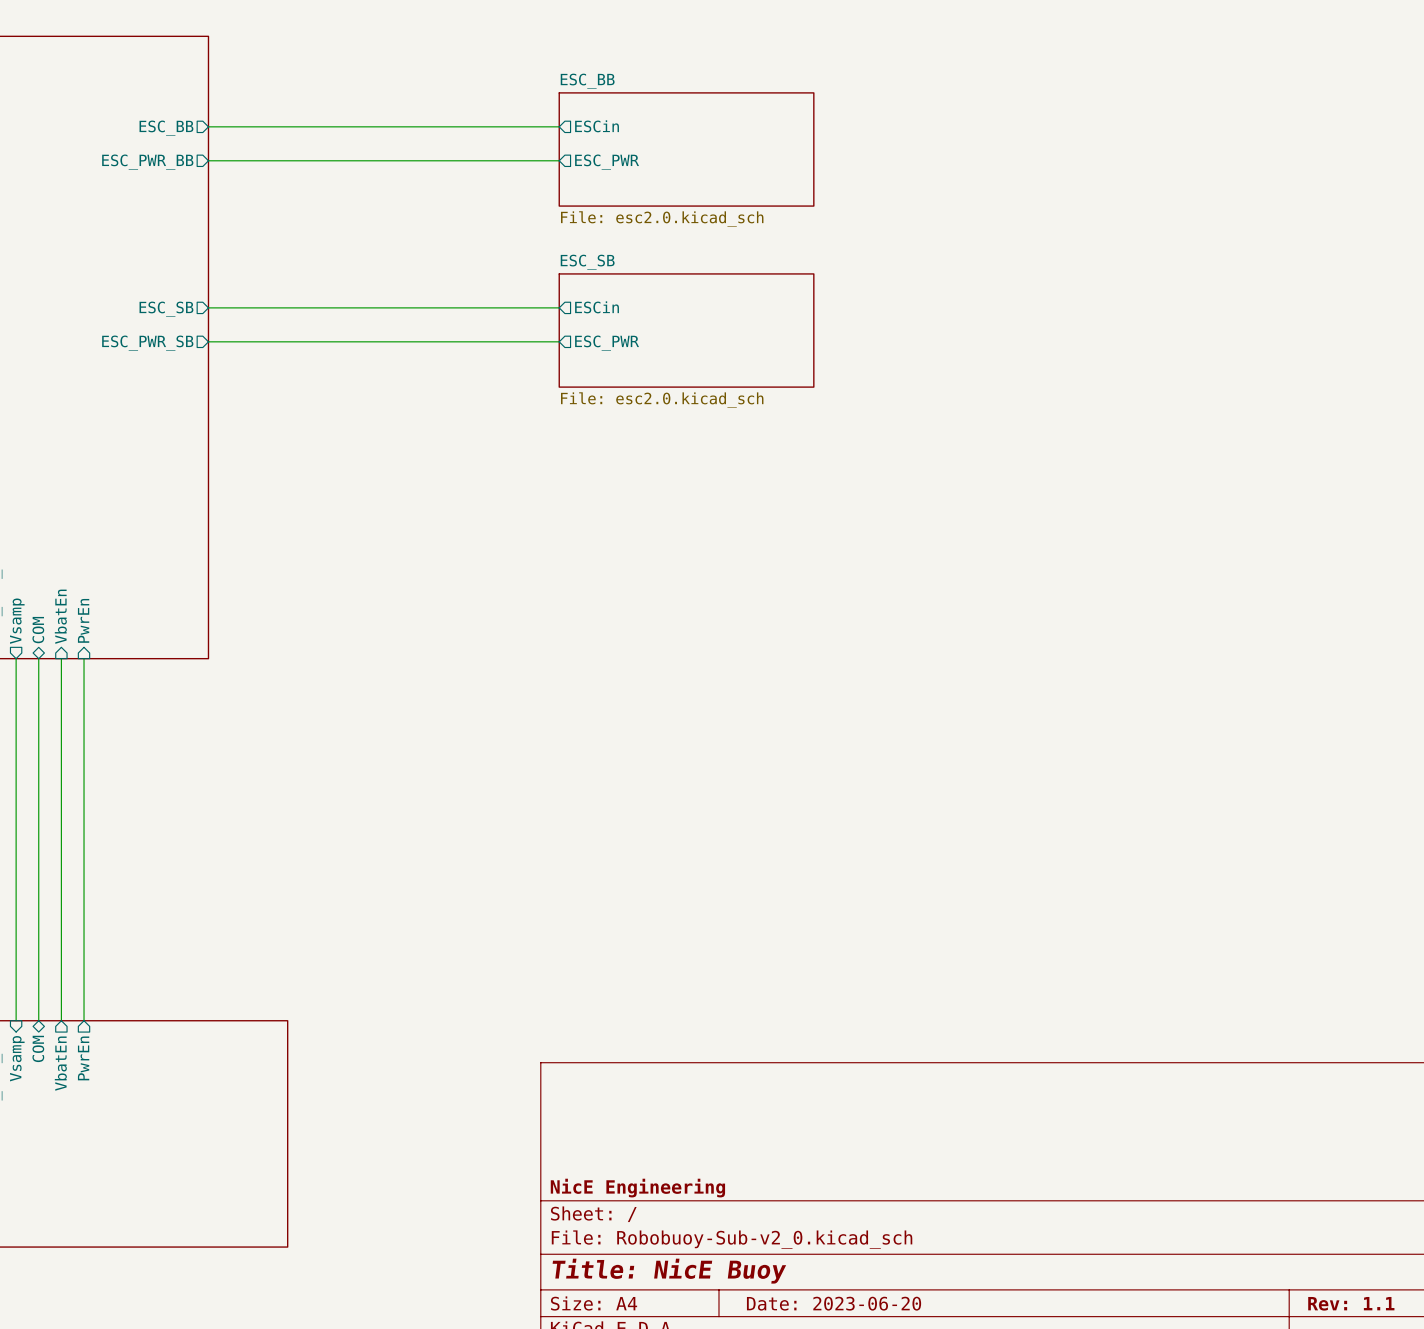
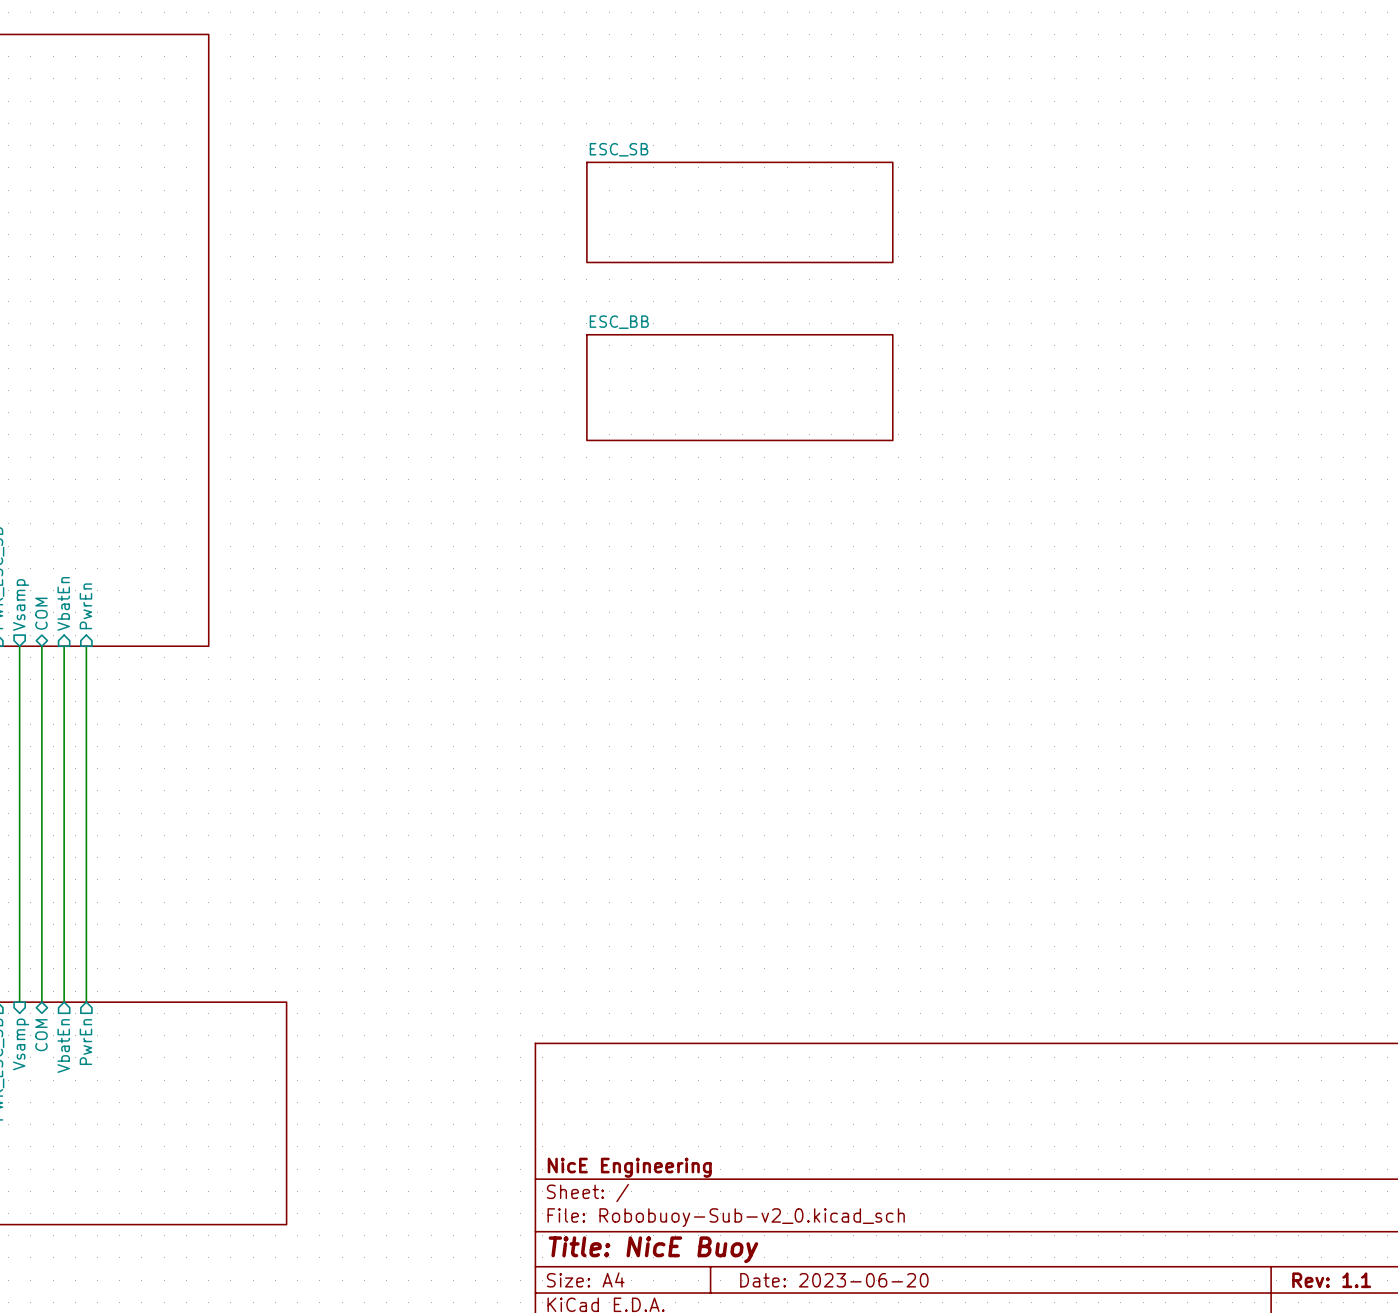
wire: (208, 126) (559, 126) -> none
sheet pin: ESCin (597, 126) -> none
sheet pin: ESC_BB (166, 128) -> none
sheet ESC_BB: File: esc2.0.kicad_sch (686, 149) -> none
wire: (208, 160) (559, 160) -> none
sheet pin: ESC_PWR_BB (147, 162) -> none
sheet pin: ESC_PWR (607, 162) -> none
sheet ESC_SB: none -> (739, 212)
wire: (208, 307) (559, 307) -> none
sheet pin: ESCin (597, 307) -> none
sheet pin: ESC_SB (166, 309) -> none
sheet ESC_SB: File: esc2.0.kicad_sch (686, 330) -> none
wire: (208, 341) (559, 341) -> none
sheet pin: ESC_PWR_SB (147, 343) -> none
sheet pin: ESC_PWR (607, 343) -> none
sheet ESC_BB: none -> (739, 387)

